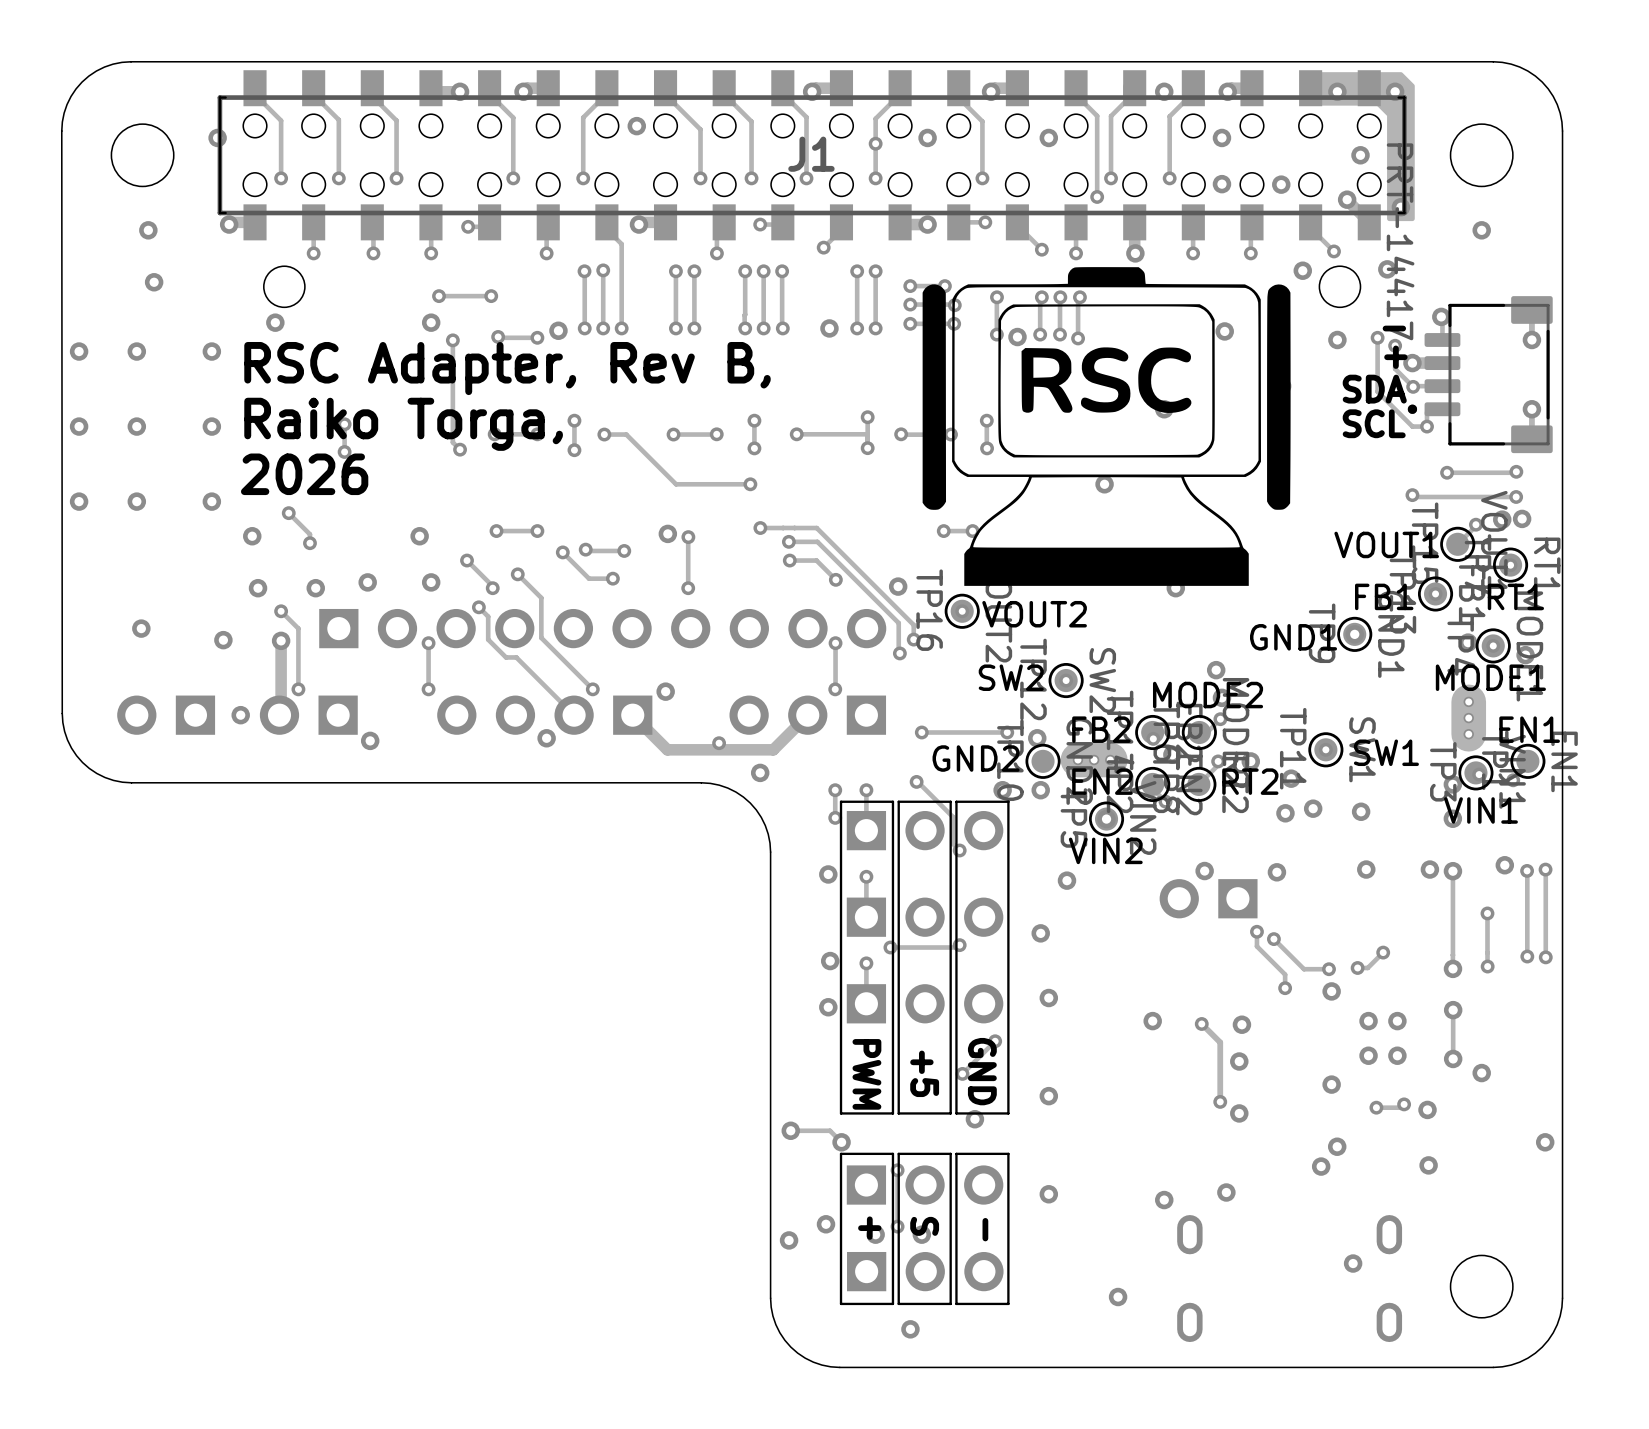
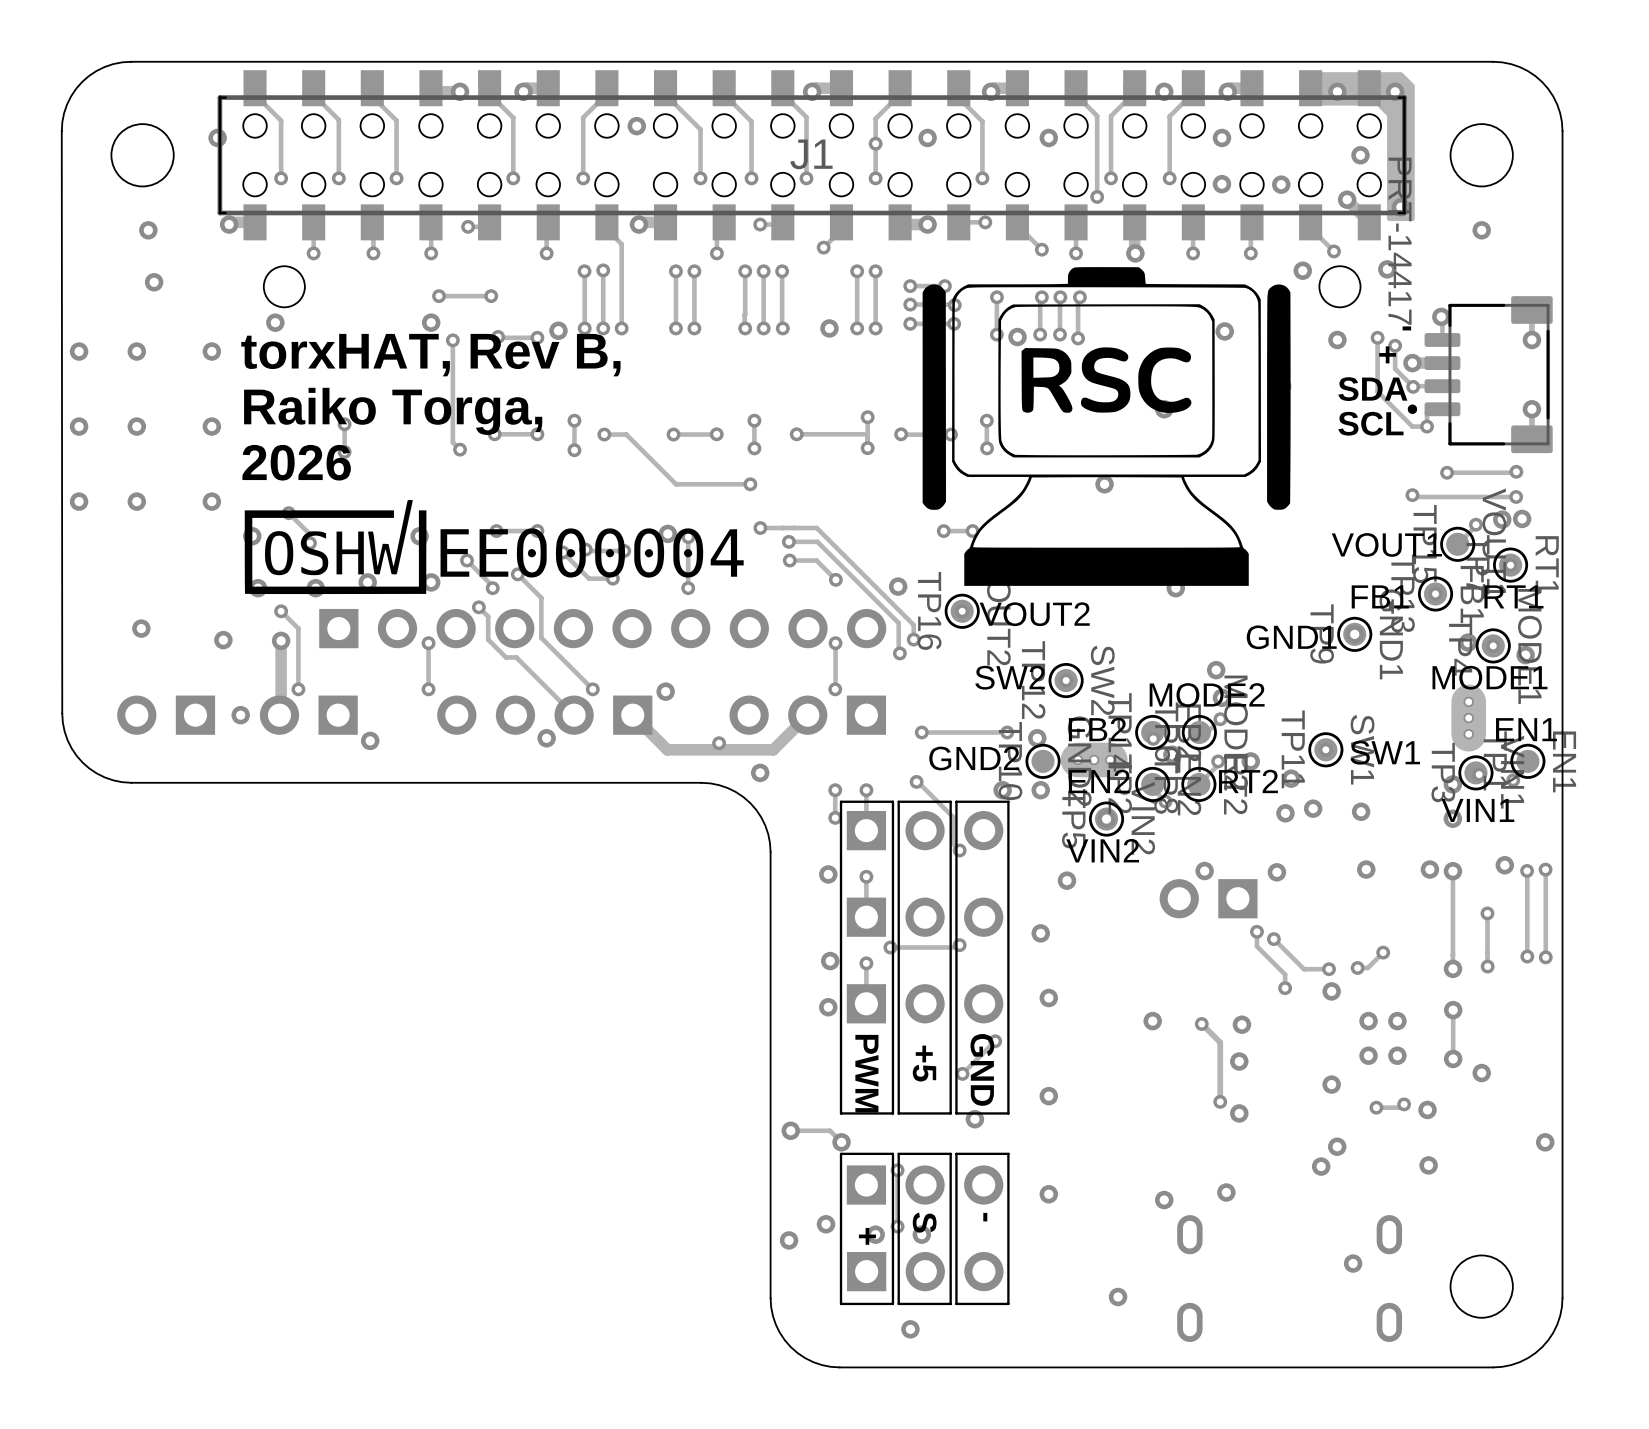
text: RSC Adapter, Rev B, (507, 368) -> torxHAT, Rev B, (430, 355)
text position: Raiko Torga, (403, 424) -> Raiko Torga, (393, 411)
text position: 2026 (304, 474) -> 2026 (296, 462)
drawing: none -> [244, 500, 744, 595]

